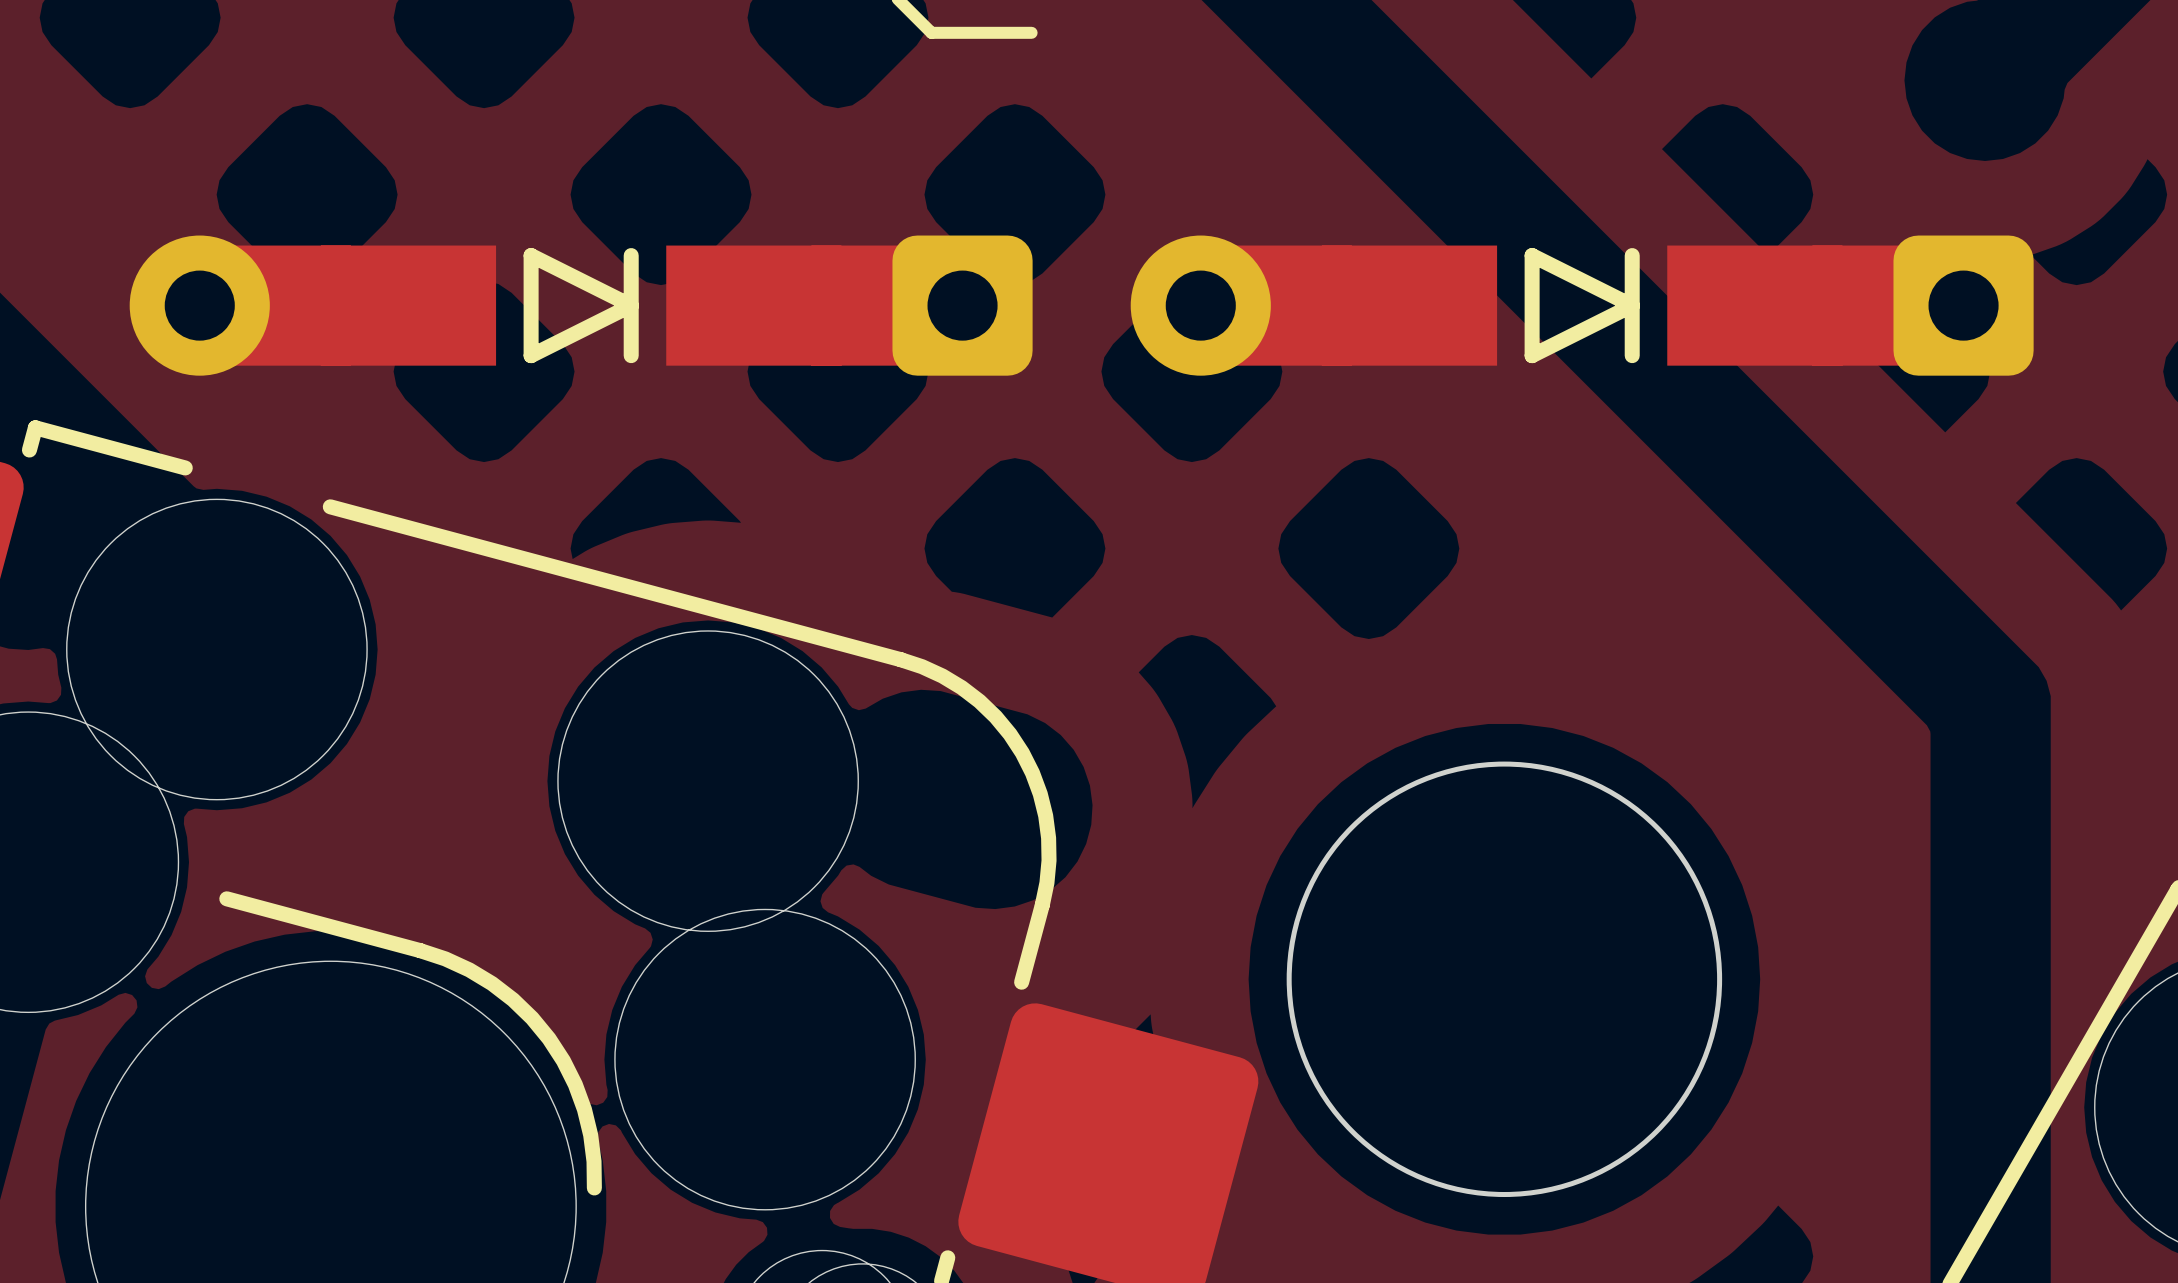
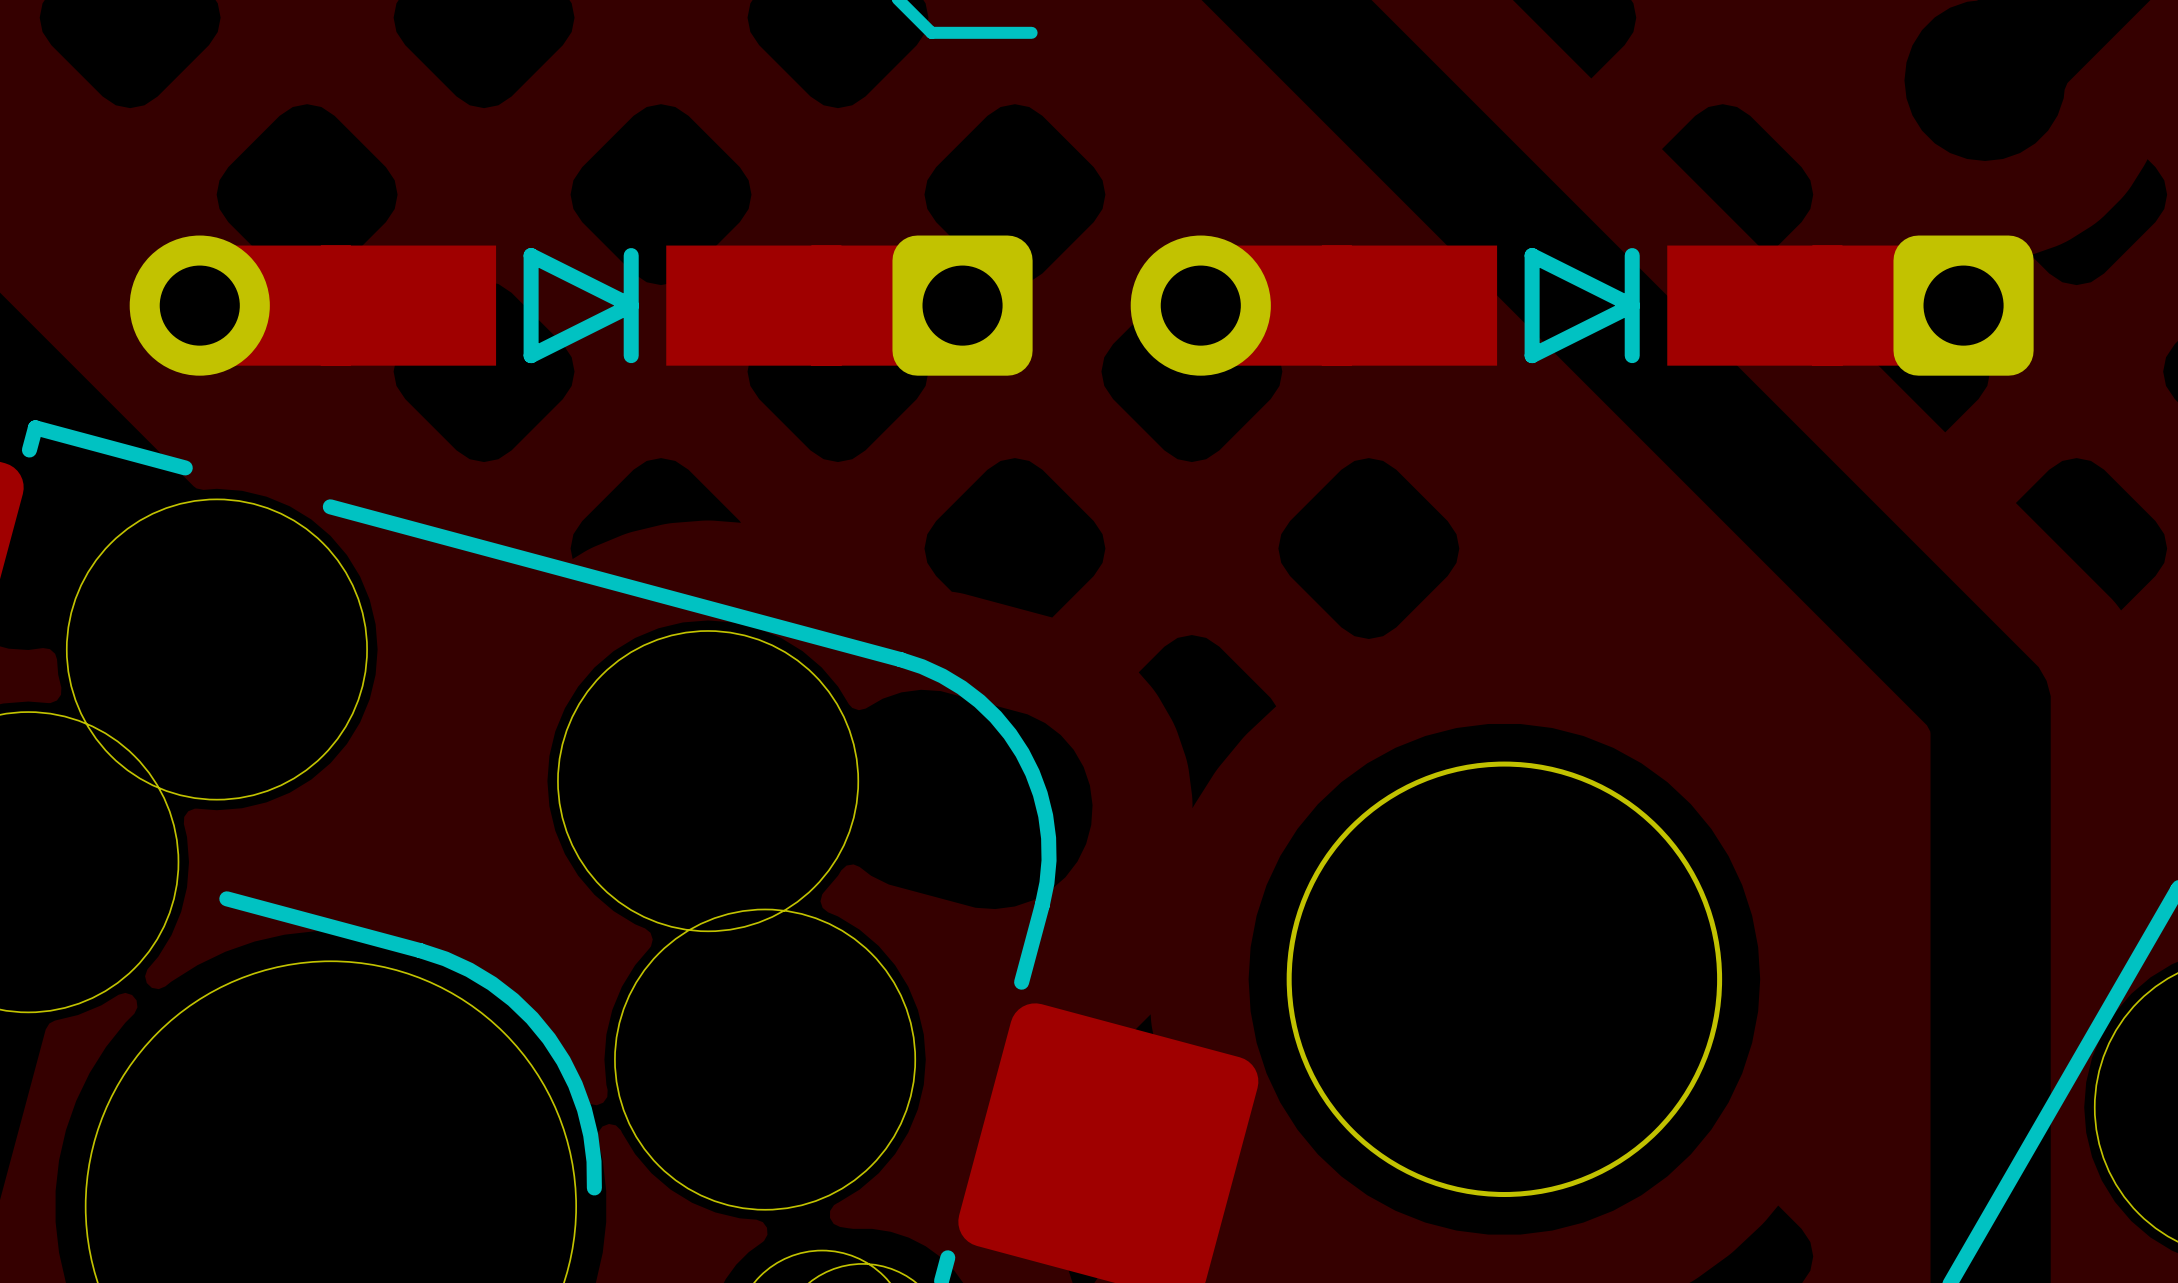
part footprint: [129, 235, 1033, 376] -> [129, 235, 1033, 376]
part footprint: [1130, 235, 2034, 376] -> [1130, 235, 2034, 376]

